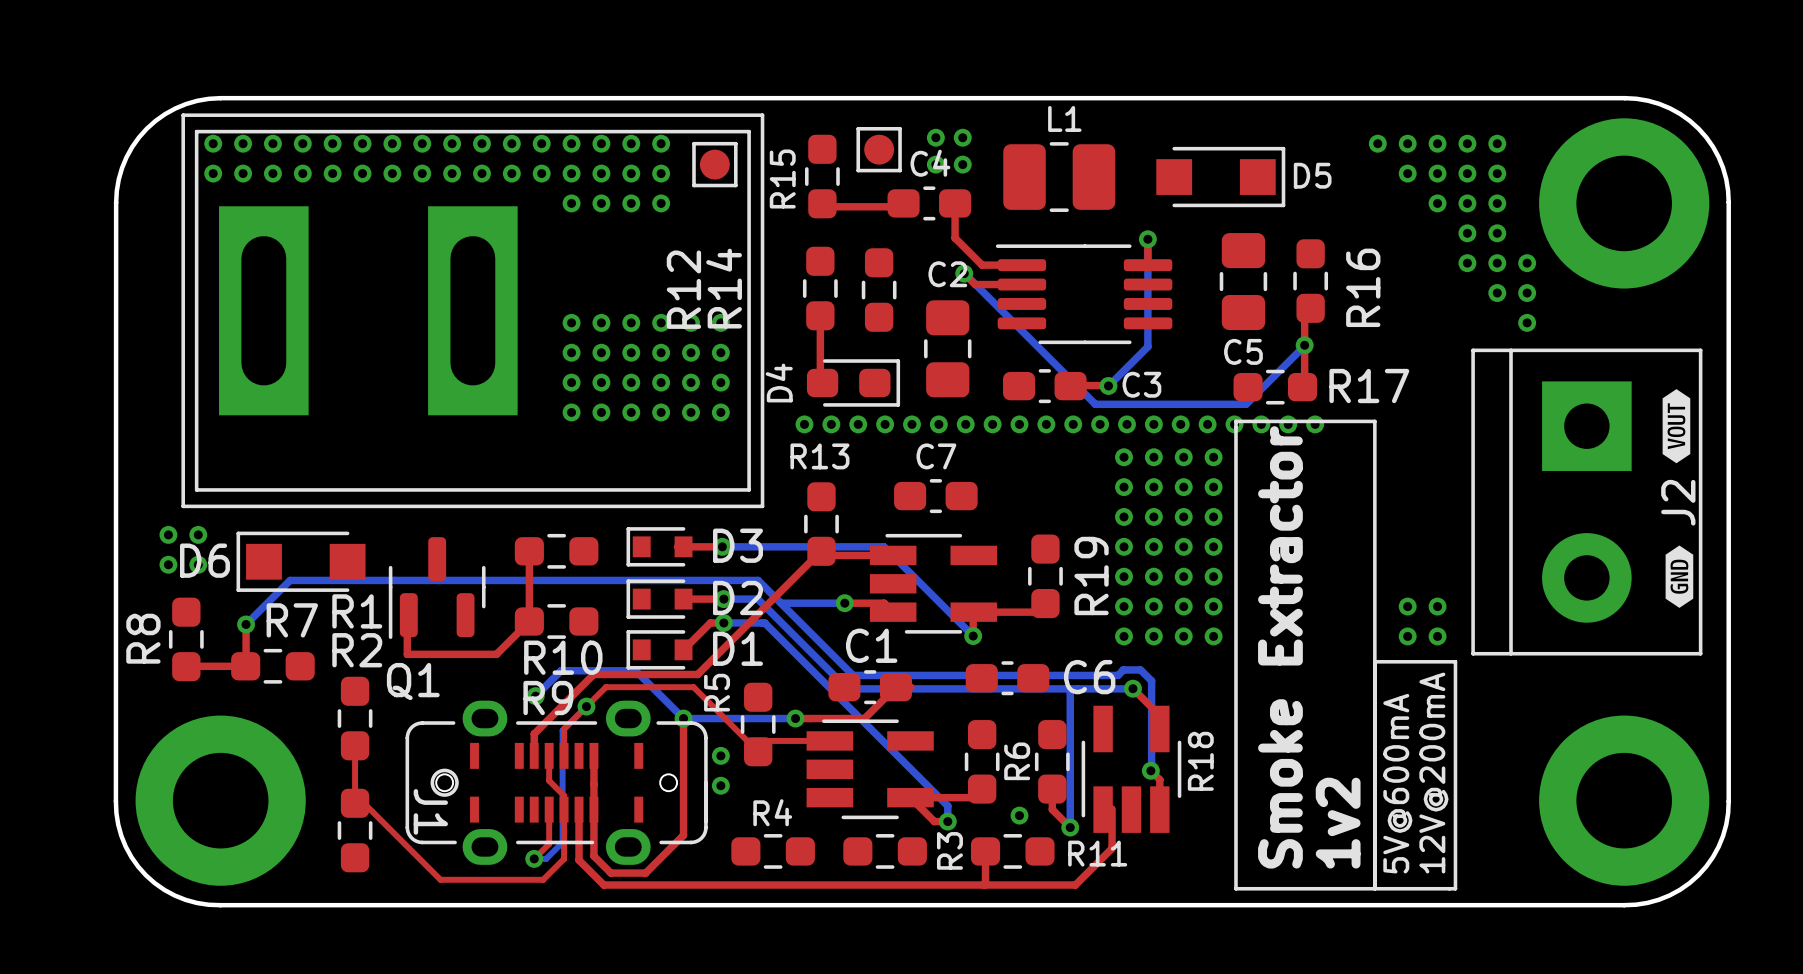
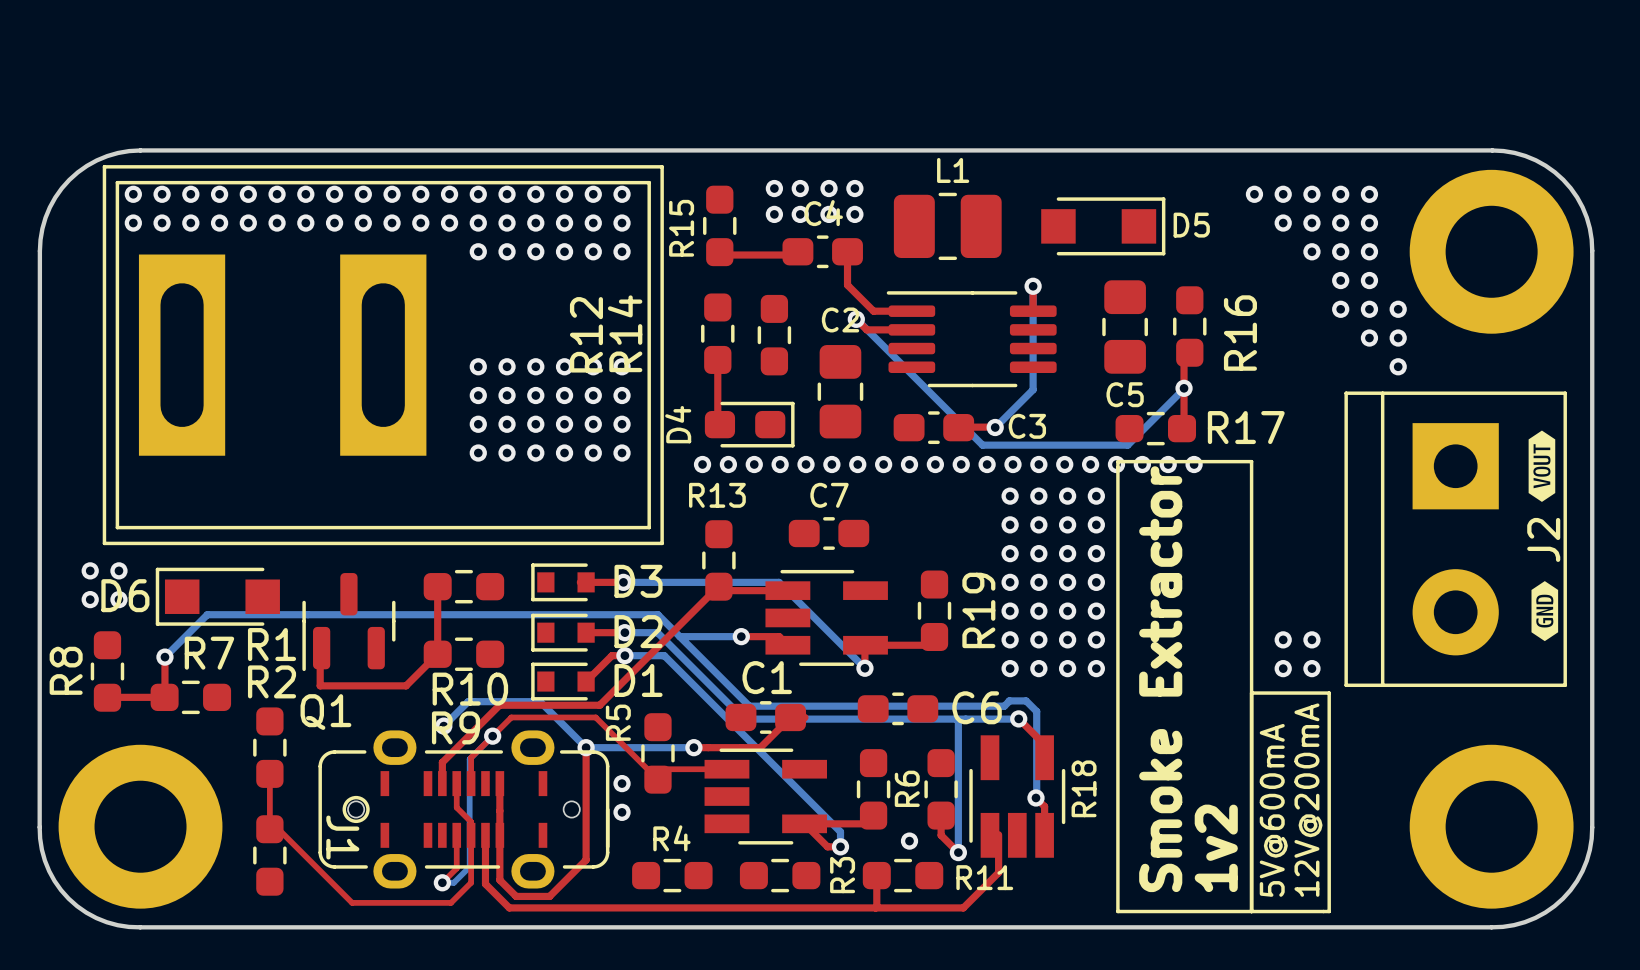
via: none -> (774, 188)
via: none -> (800, 188)
via: none -> (593, 194)
via: none -> (622, 194)
part: (879, 149) -> none
part: (714, 164) -> none
via: none -> (774, 214)
via: none -> (800, 214)
via: none -> (593, 223)
via: none -> (622, 223)
via: none -> (593, 251)
via: none -> (622, 251)

